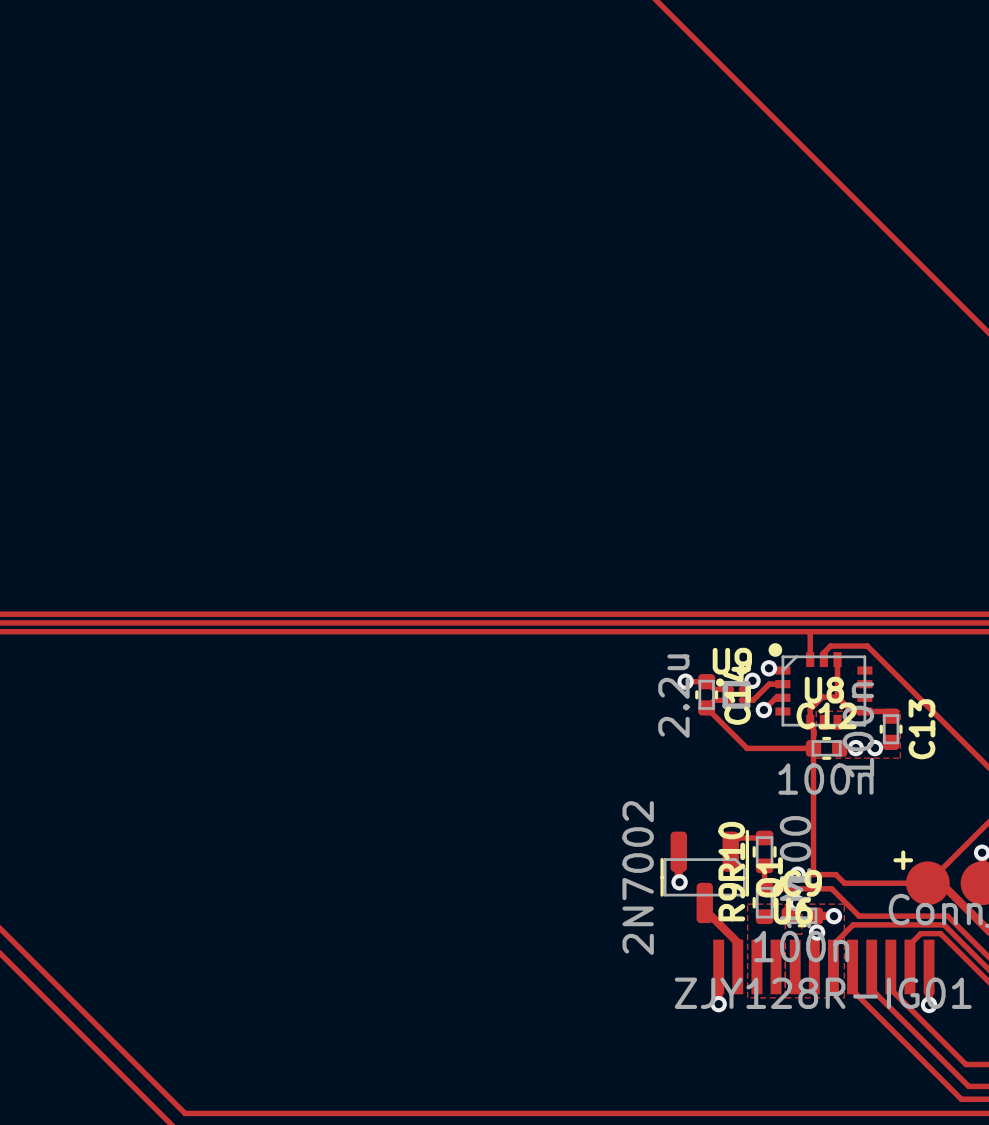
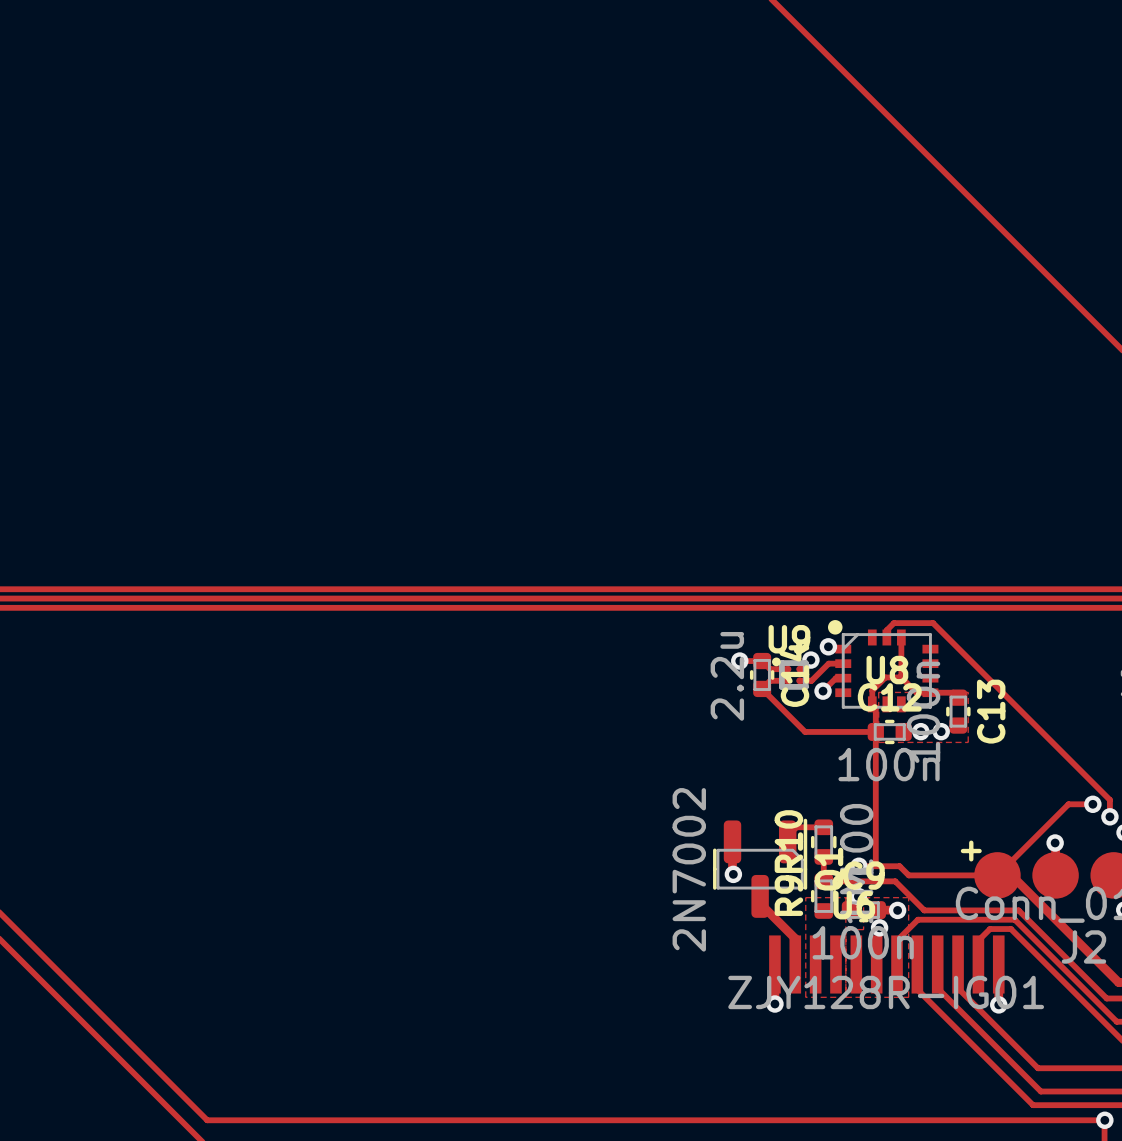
track: (810, 631) (810, 659) -> none

